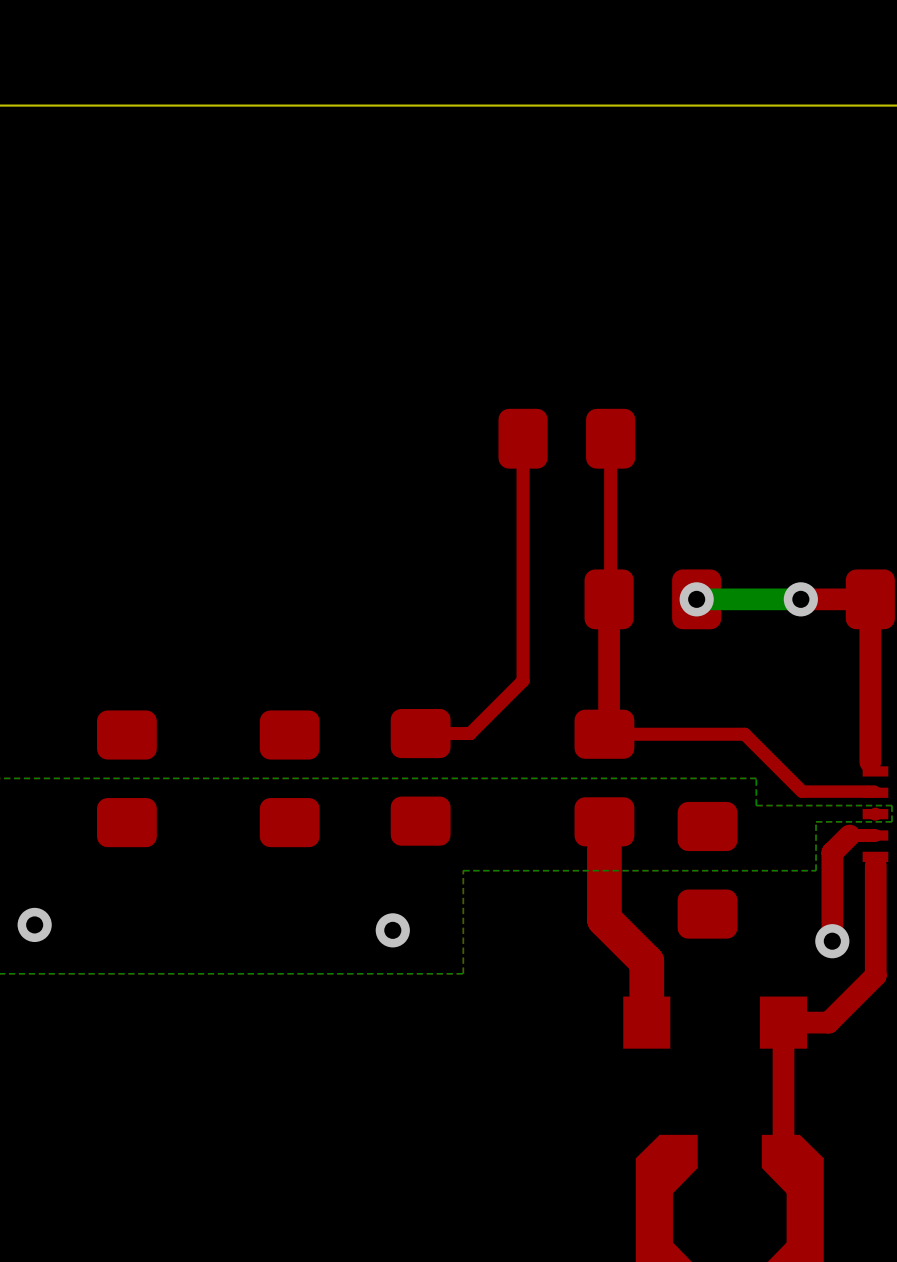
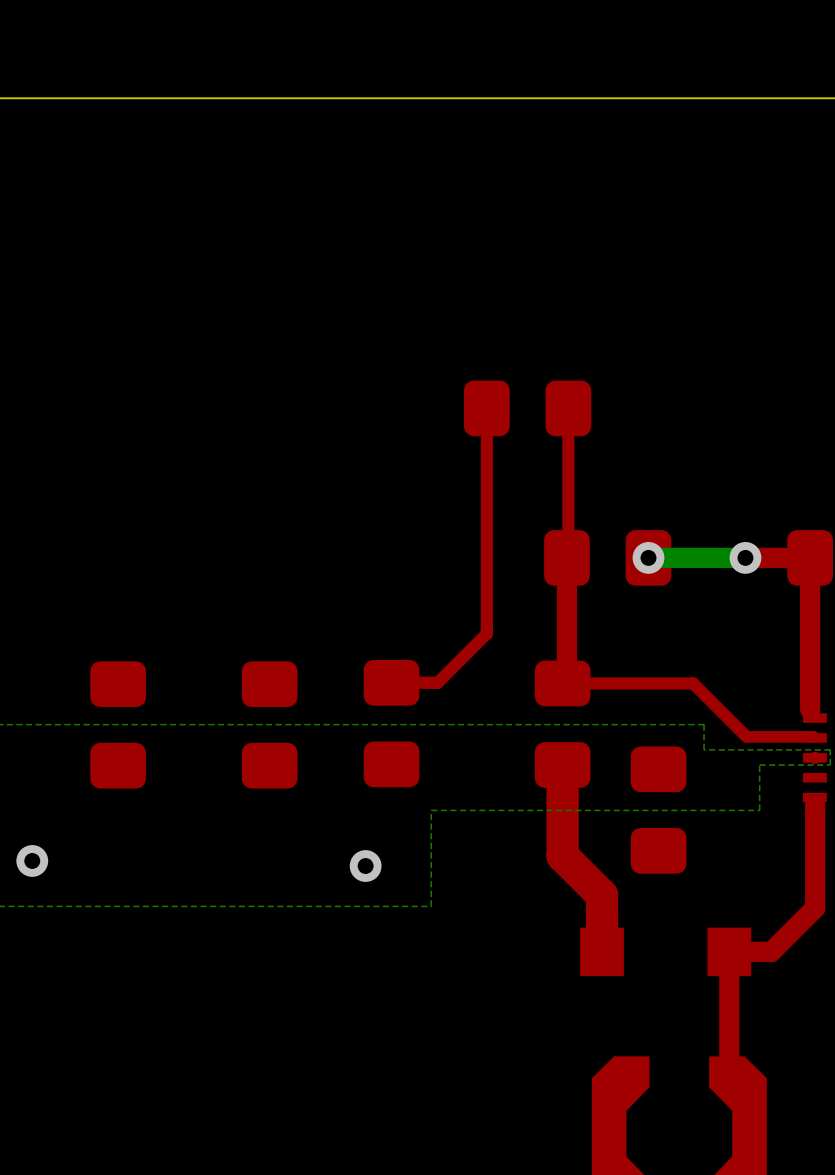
top track: (875, 835) (849, 835) (832, 852) (832, 941) -> none
via: (832, 941) -> none

